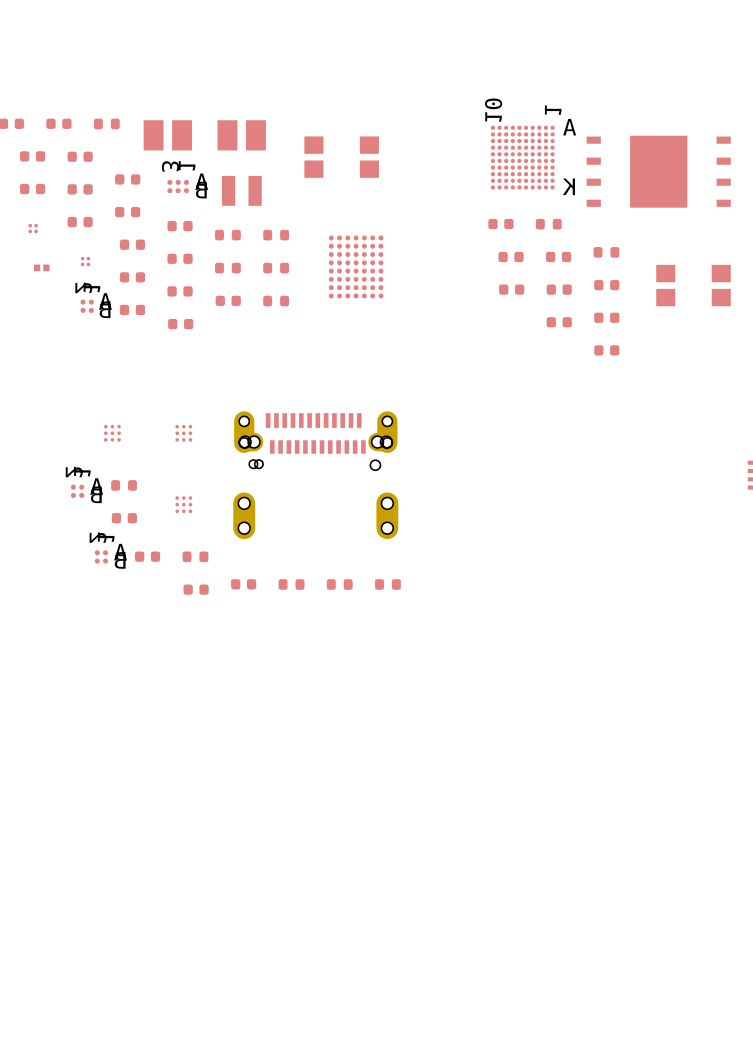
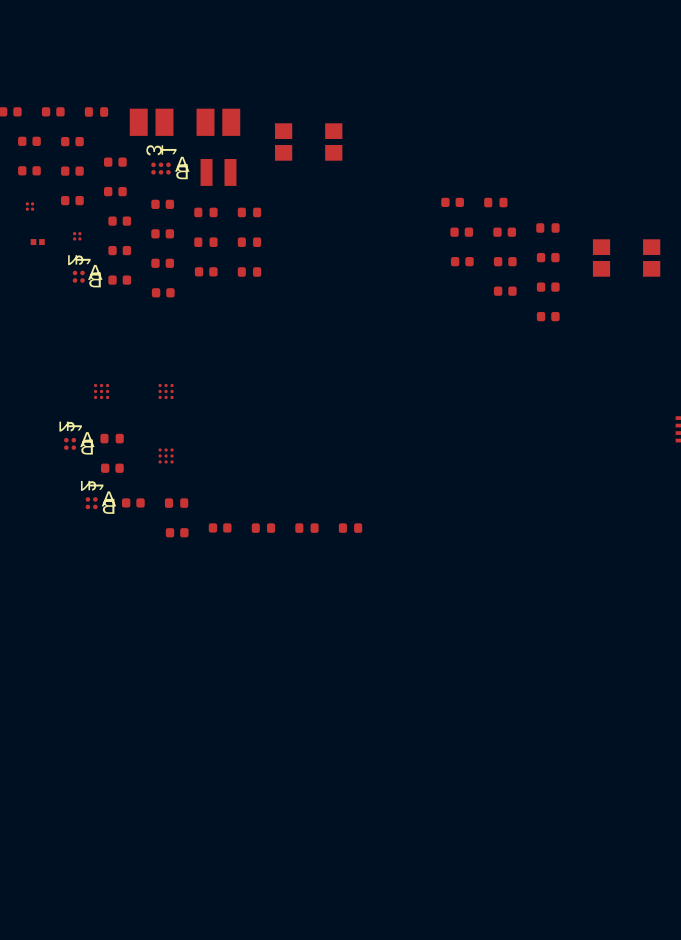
part: (522, 157) -> none
part: (658, 171) -> none
part: (356, 266) -> none
part: (315, 475) -> none

